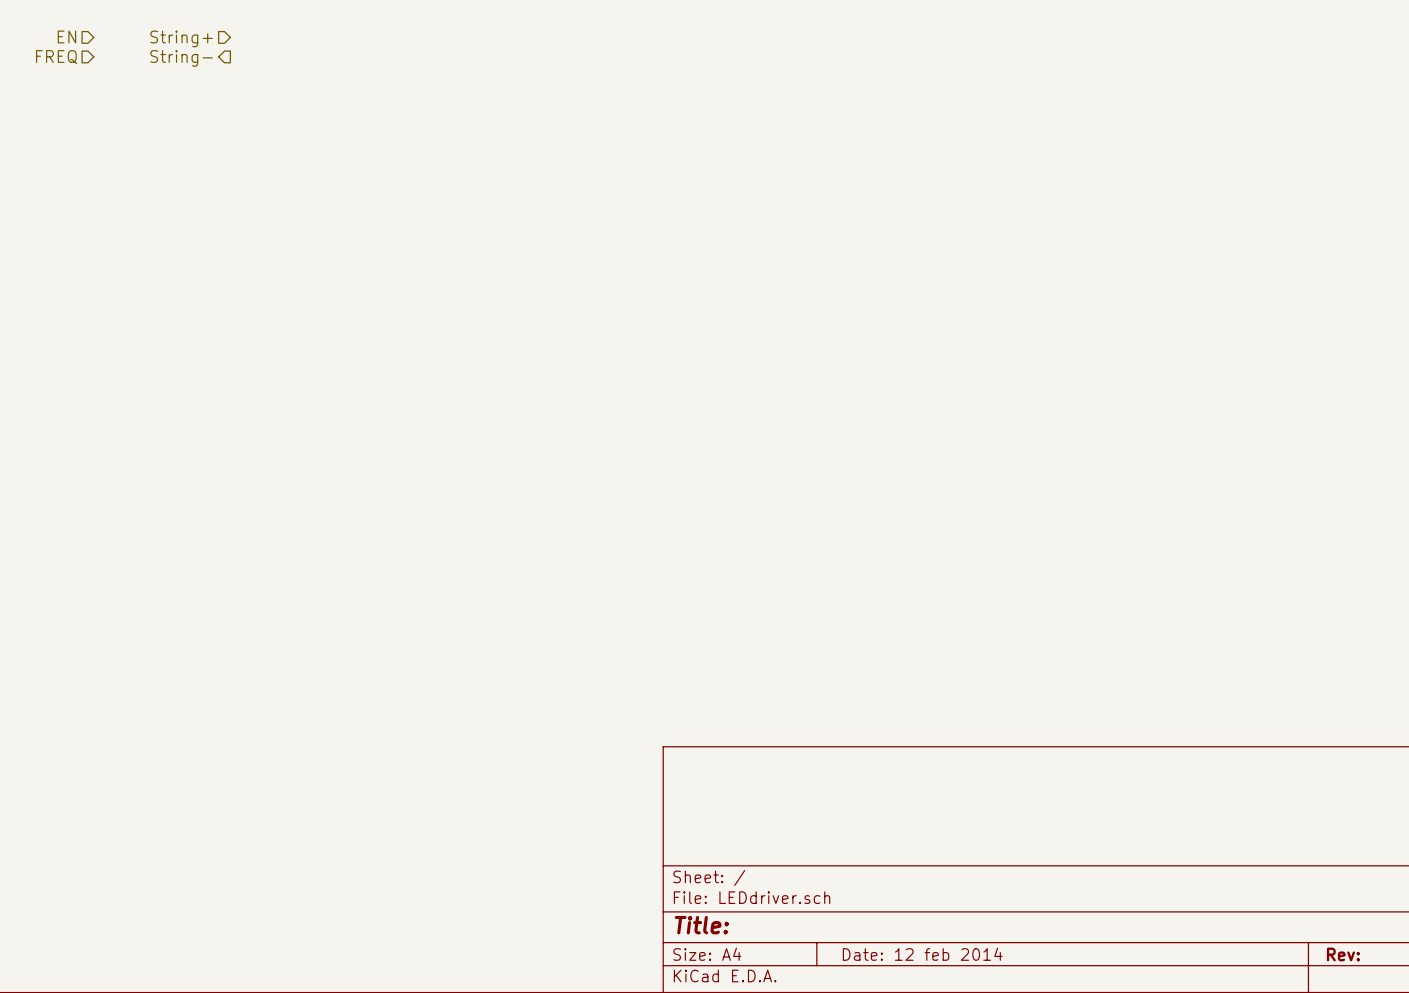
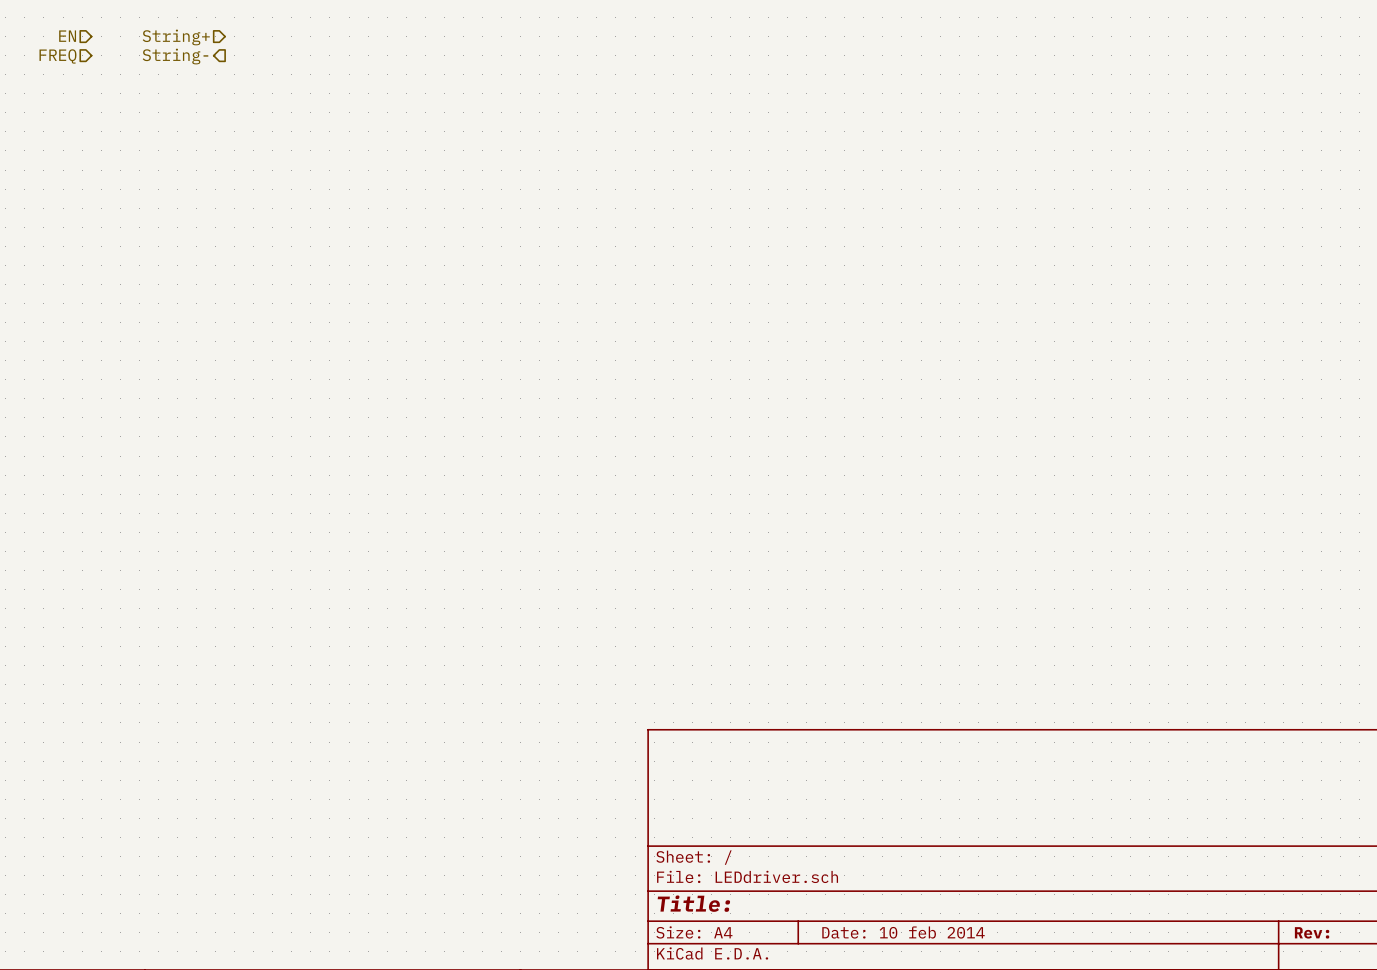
title block: Date: 12 feb 2014 (922, 954) -> Date: 10 feb 2014 (903, 932)

